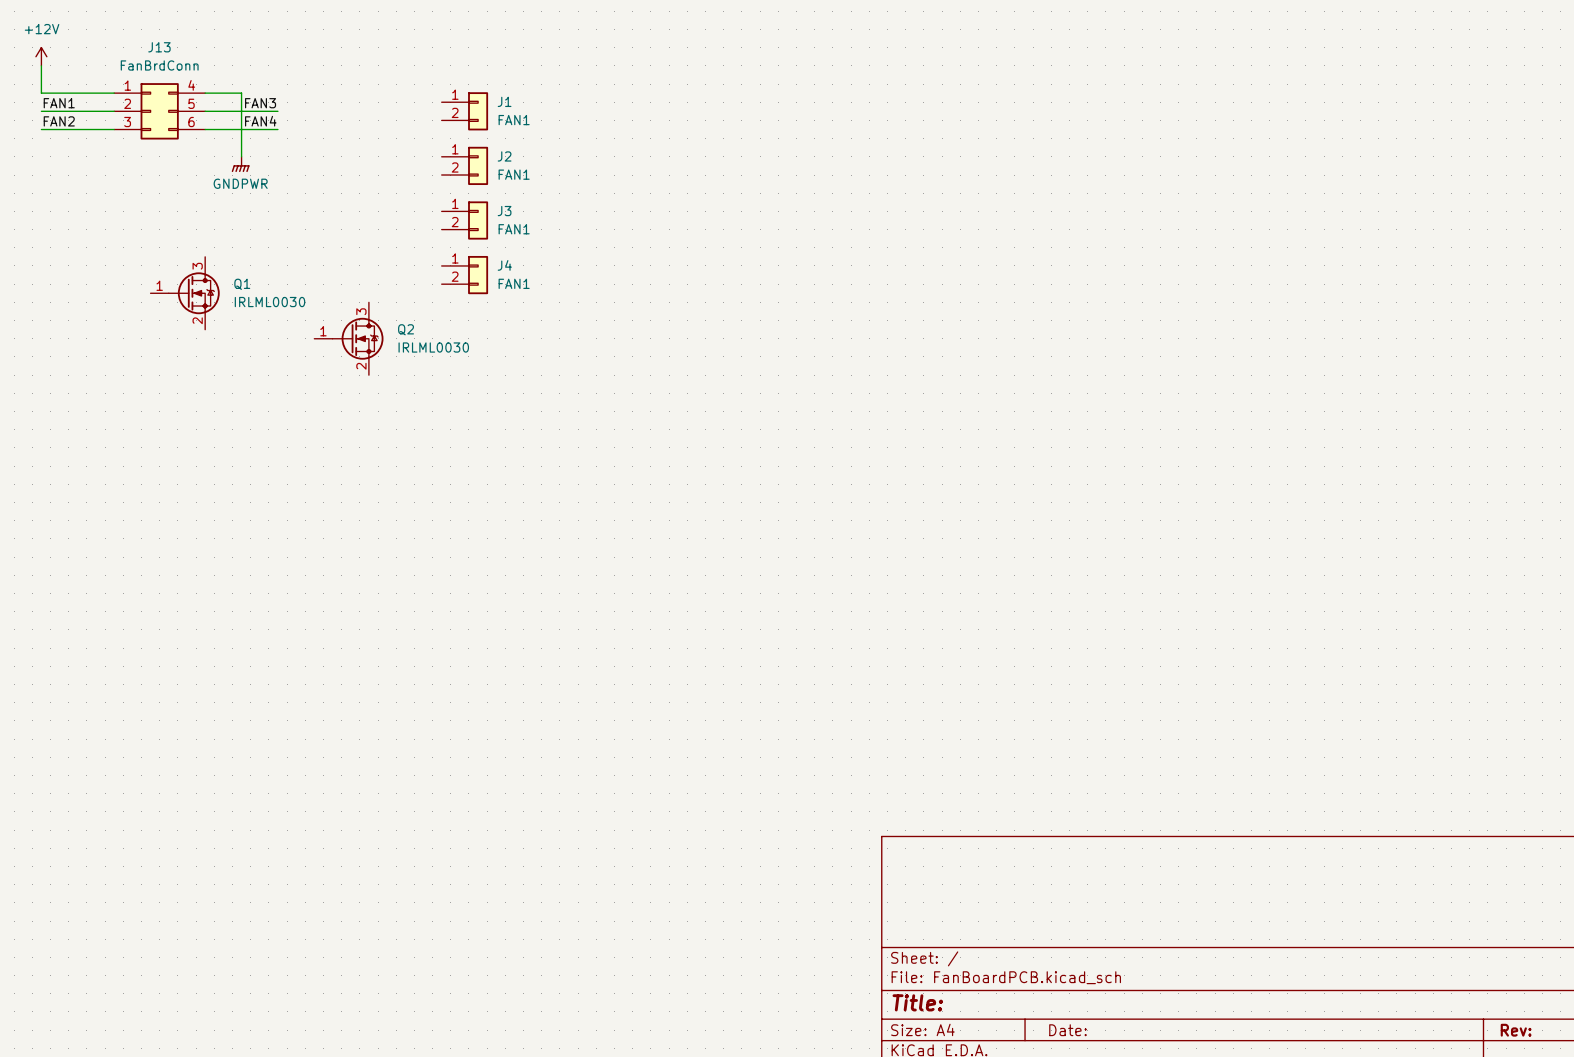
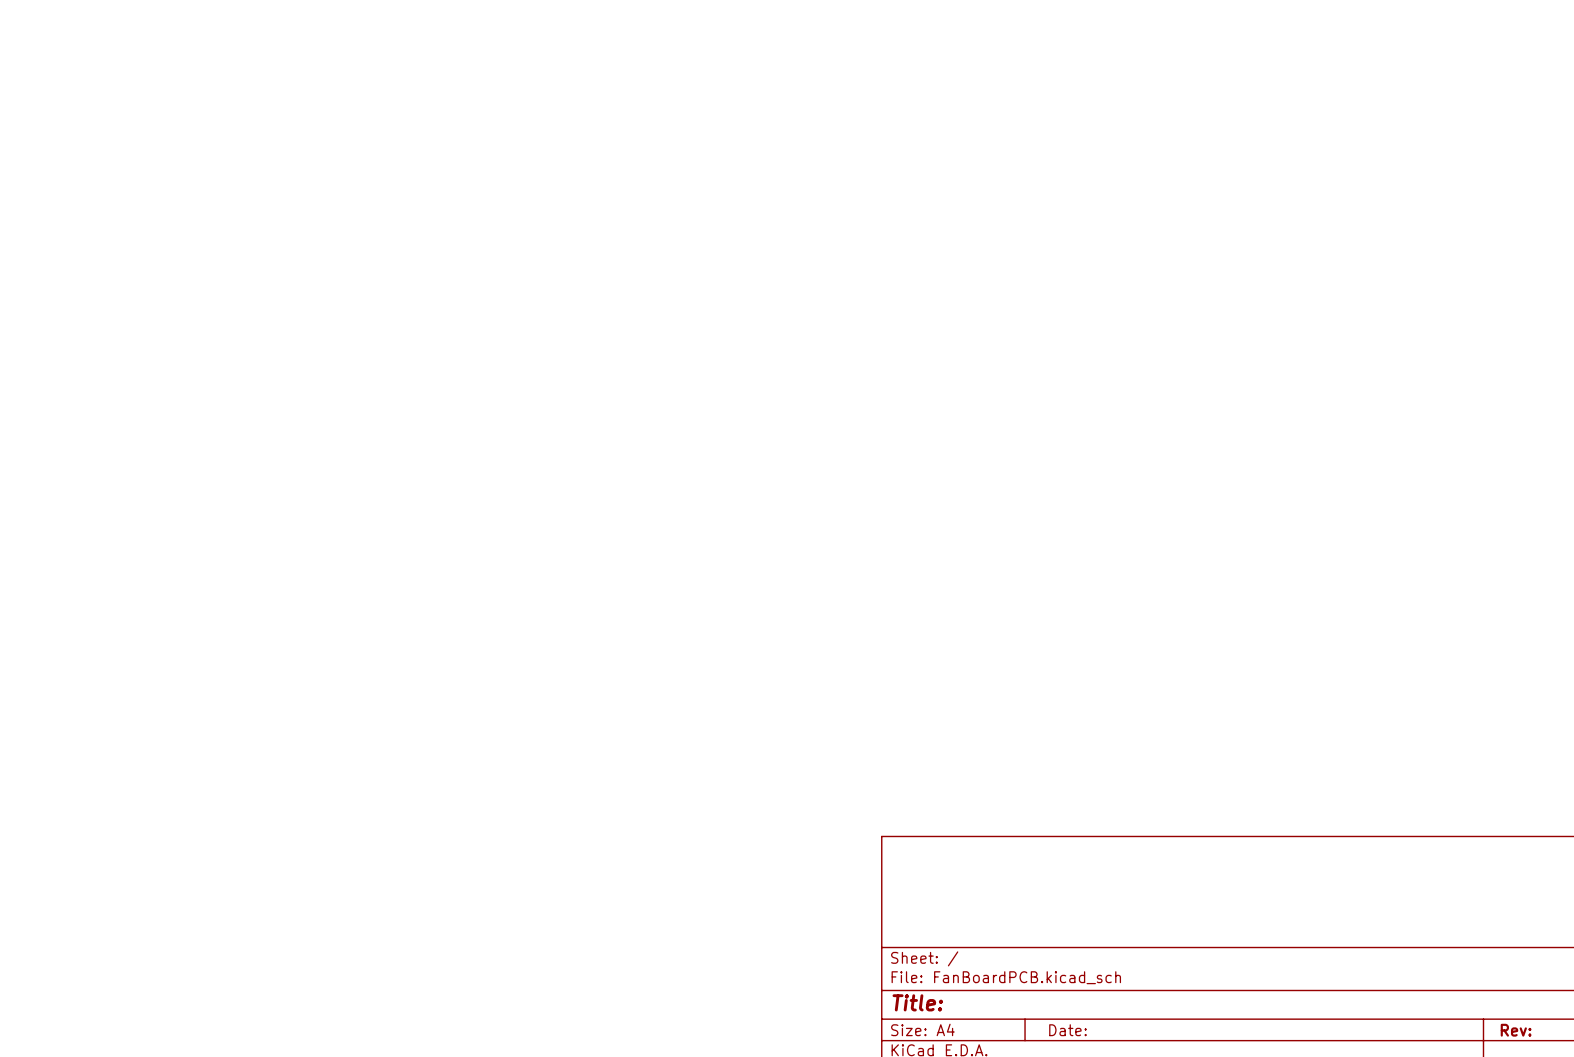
power symbol: +12V (41, 56) -> none
wire: (41, 65) (41, 93) (114, 93) -> none
wire: (205, 93) (241, 93) (241, 156) -> none
label: FAN1 (59, 103) -> none
label: FAN3 (260, 103) -> none
wire: (41, 111) (114, 111) -> none
J13: FanBrdConn (159, 111) -> none
wire: (205, 111) (277, 111) -> none
J1: FAN1 (464, 111) -> none
label: FAN2 (59, 121) -> none
label: FAN4 (260, 121) -> none
wire: (41, 129) (114, 129) -> none
wire: (205, 129) (277, 129) -> none
power symbol: GNDPWR (240, 164) -> none
J2: FAN1 (464, 165) -> none
J3: FAN1 (464, 220) -> none
J4: FAN1 (464, 275) -> none
Q1: IRLML0030 (185, 293) -> none
Q2: IRLML0030 (348, 338) -> none

